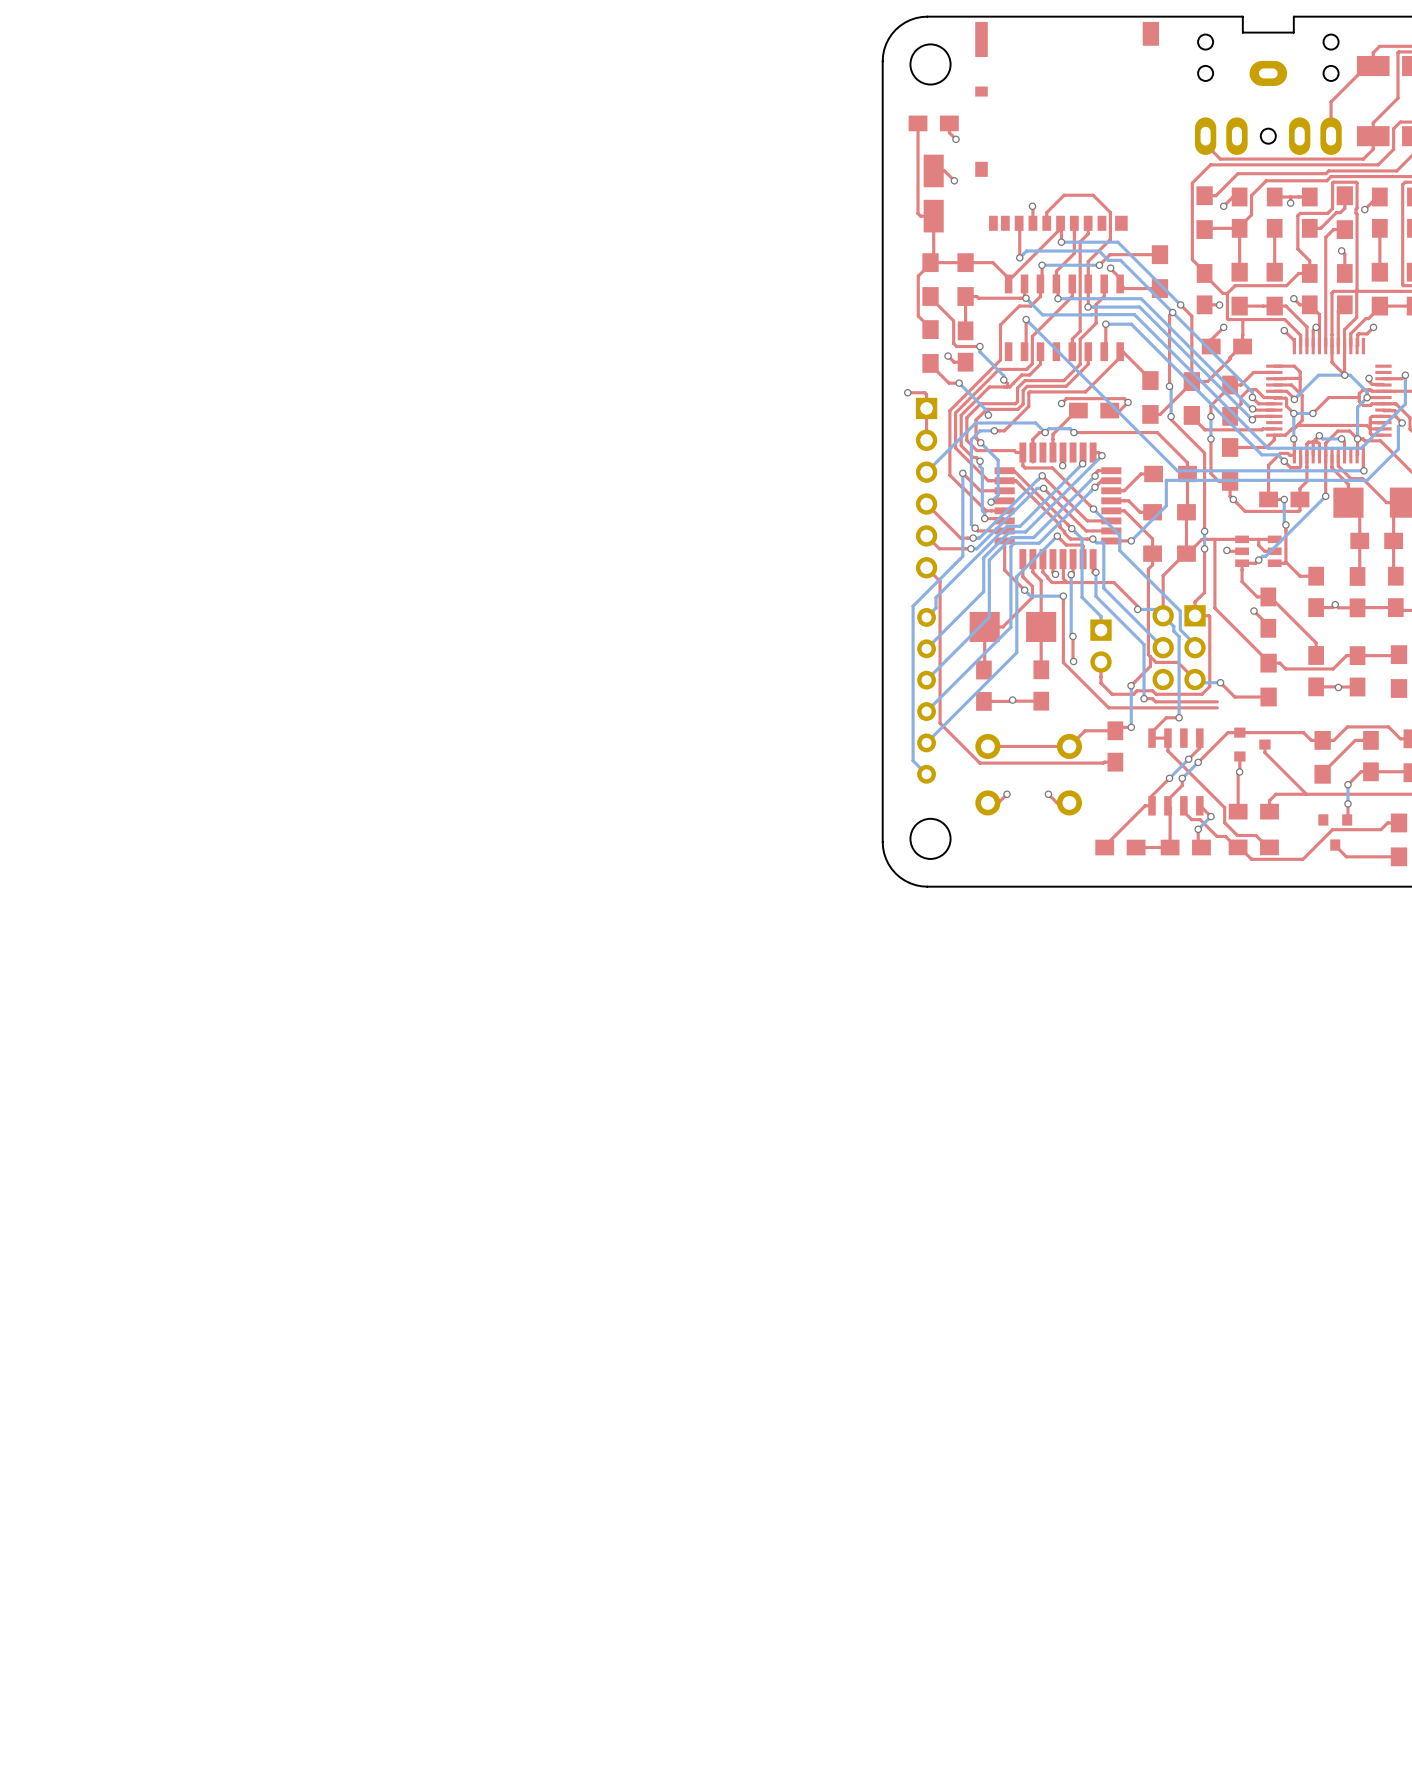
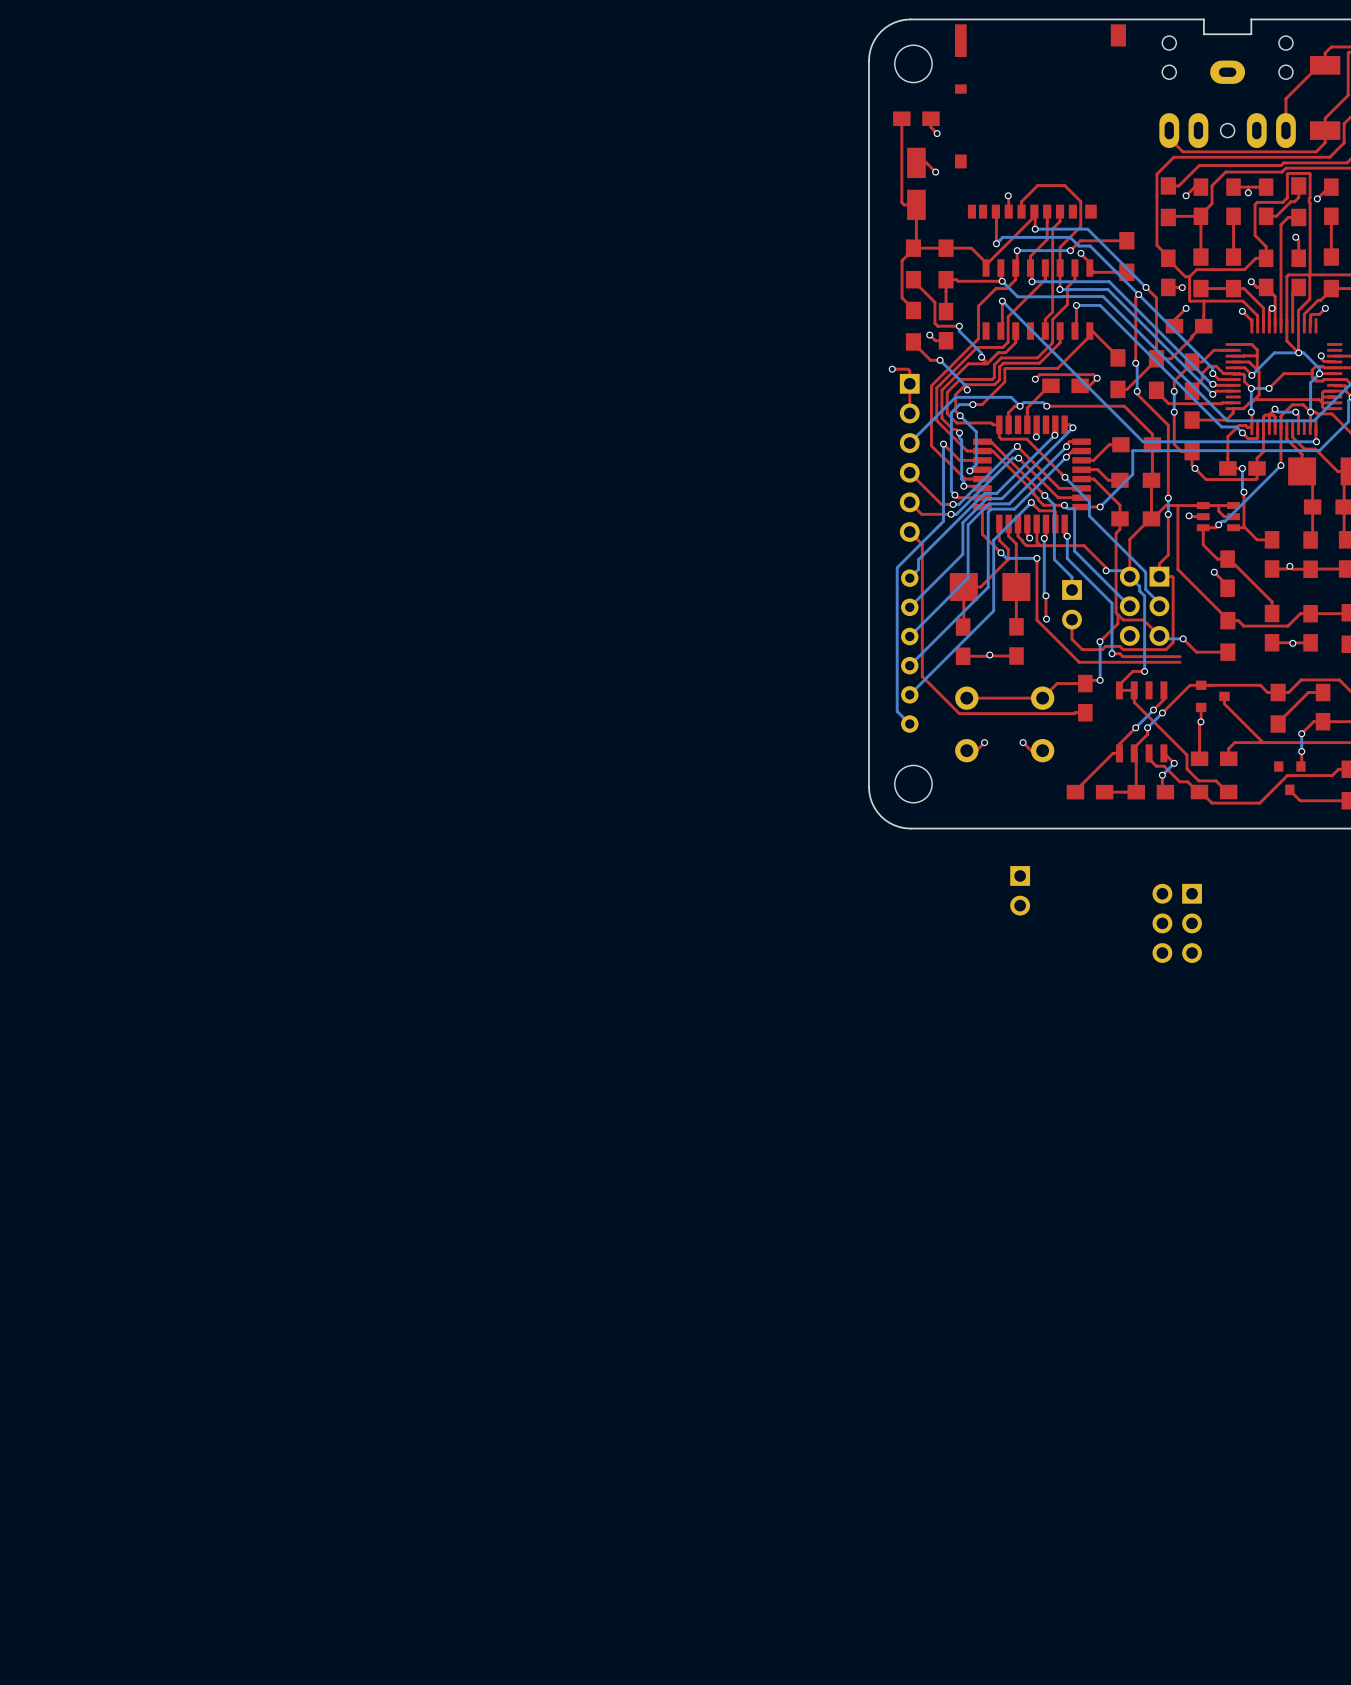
part: none -> (1020, 890)
part: none -> (1177, 923)

